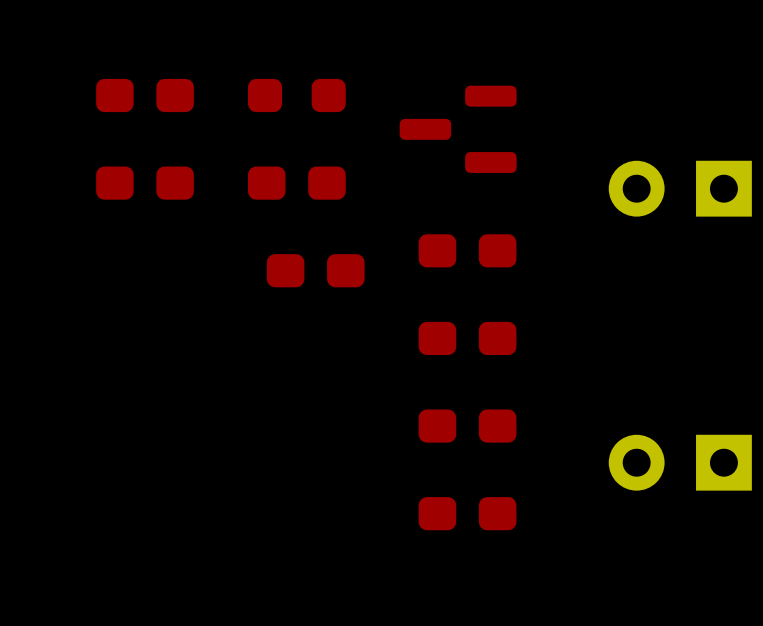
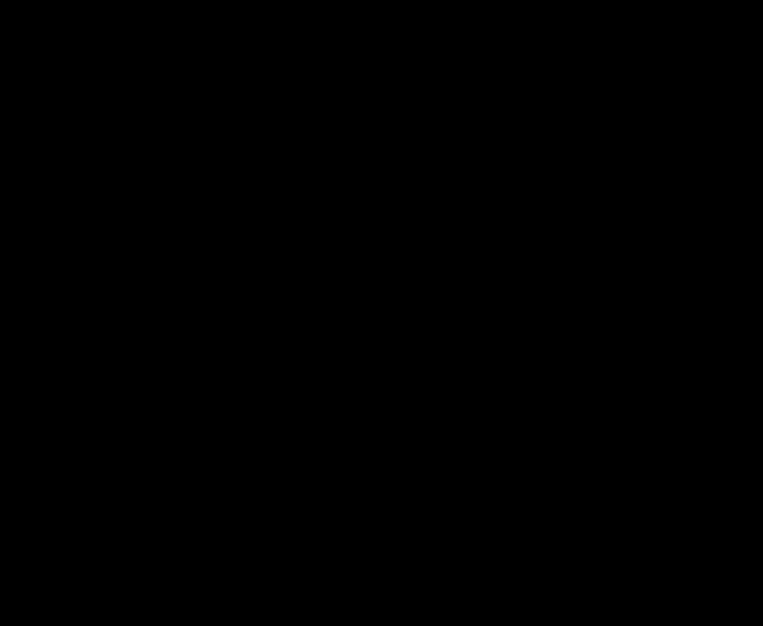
part: (145, 95) -> none
part: (296, 95) -> none
part: (458, 129) -> none
part: (145, 183) -> none
part: (296, 183) -> none
part: (680, 188) -> none
part: (467, 250) -> none
part: (315, 270) -> none
part: (467, 338) -> none
part: (467, 426) -> none
part: (680, 462) -> none
part: (467, 513) -> none

